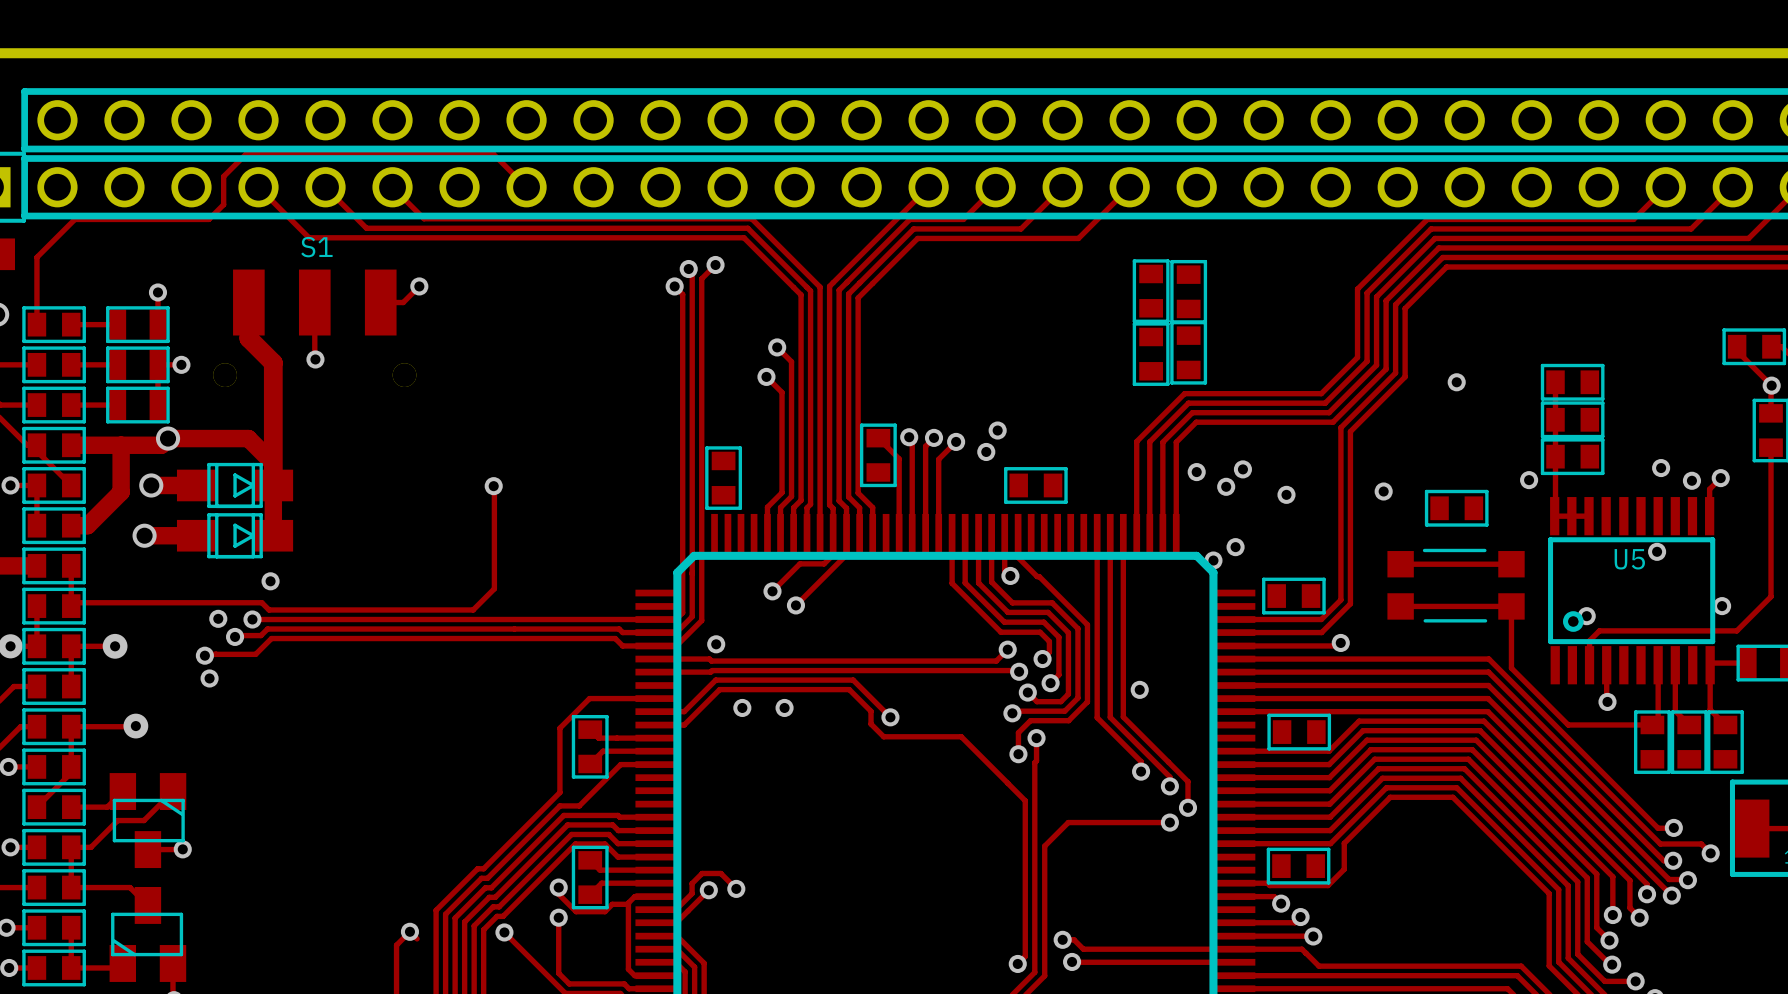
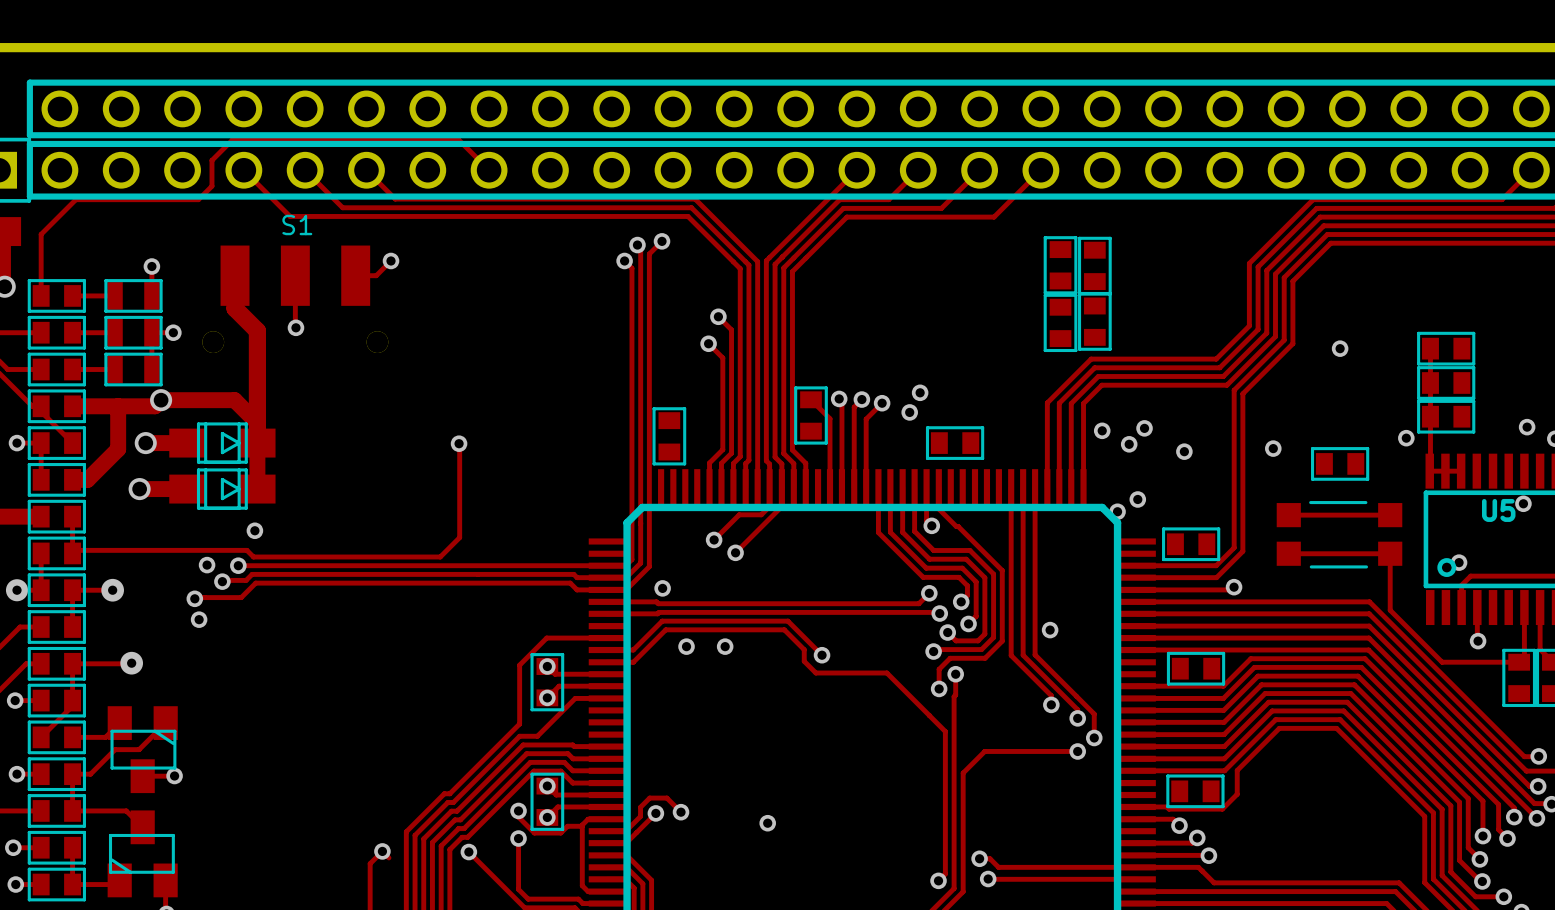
via: none -> (547, 666)
via: none -> (547, 697)
via: none -> (547, 786)
via: none -> (547, 817)
via: none -> (767, 823)

